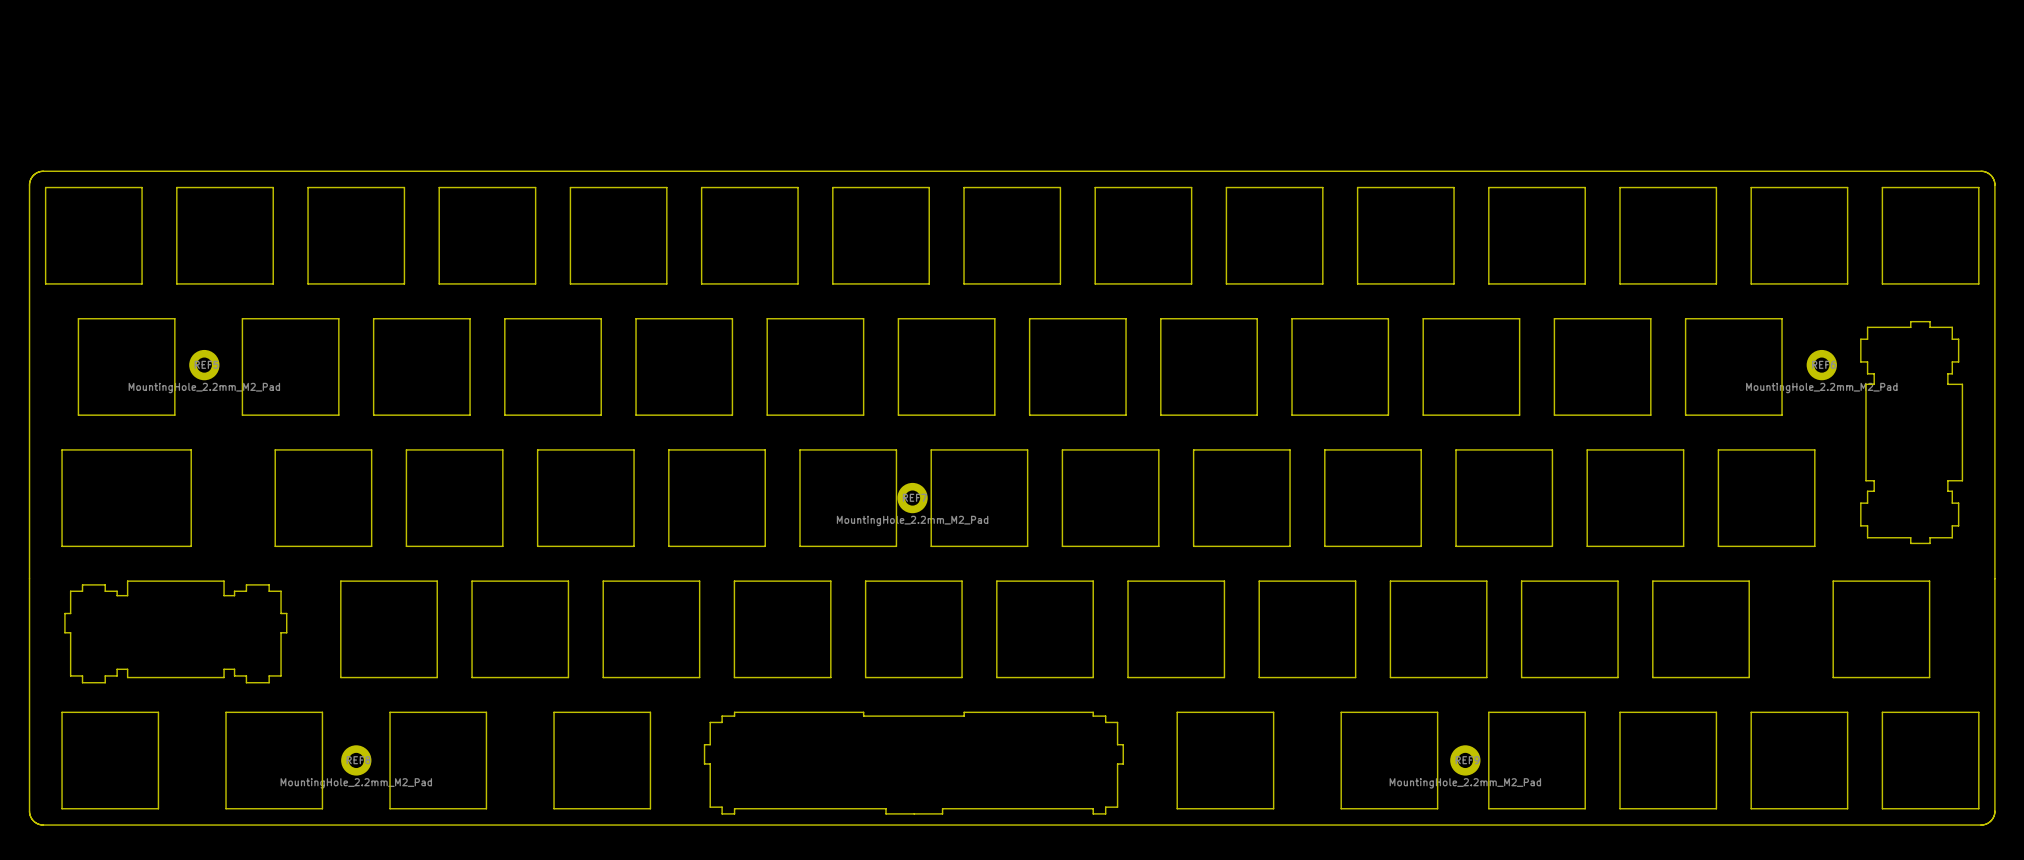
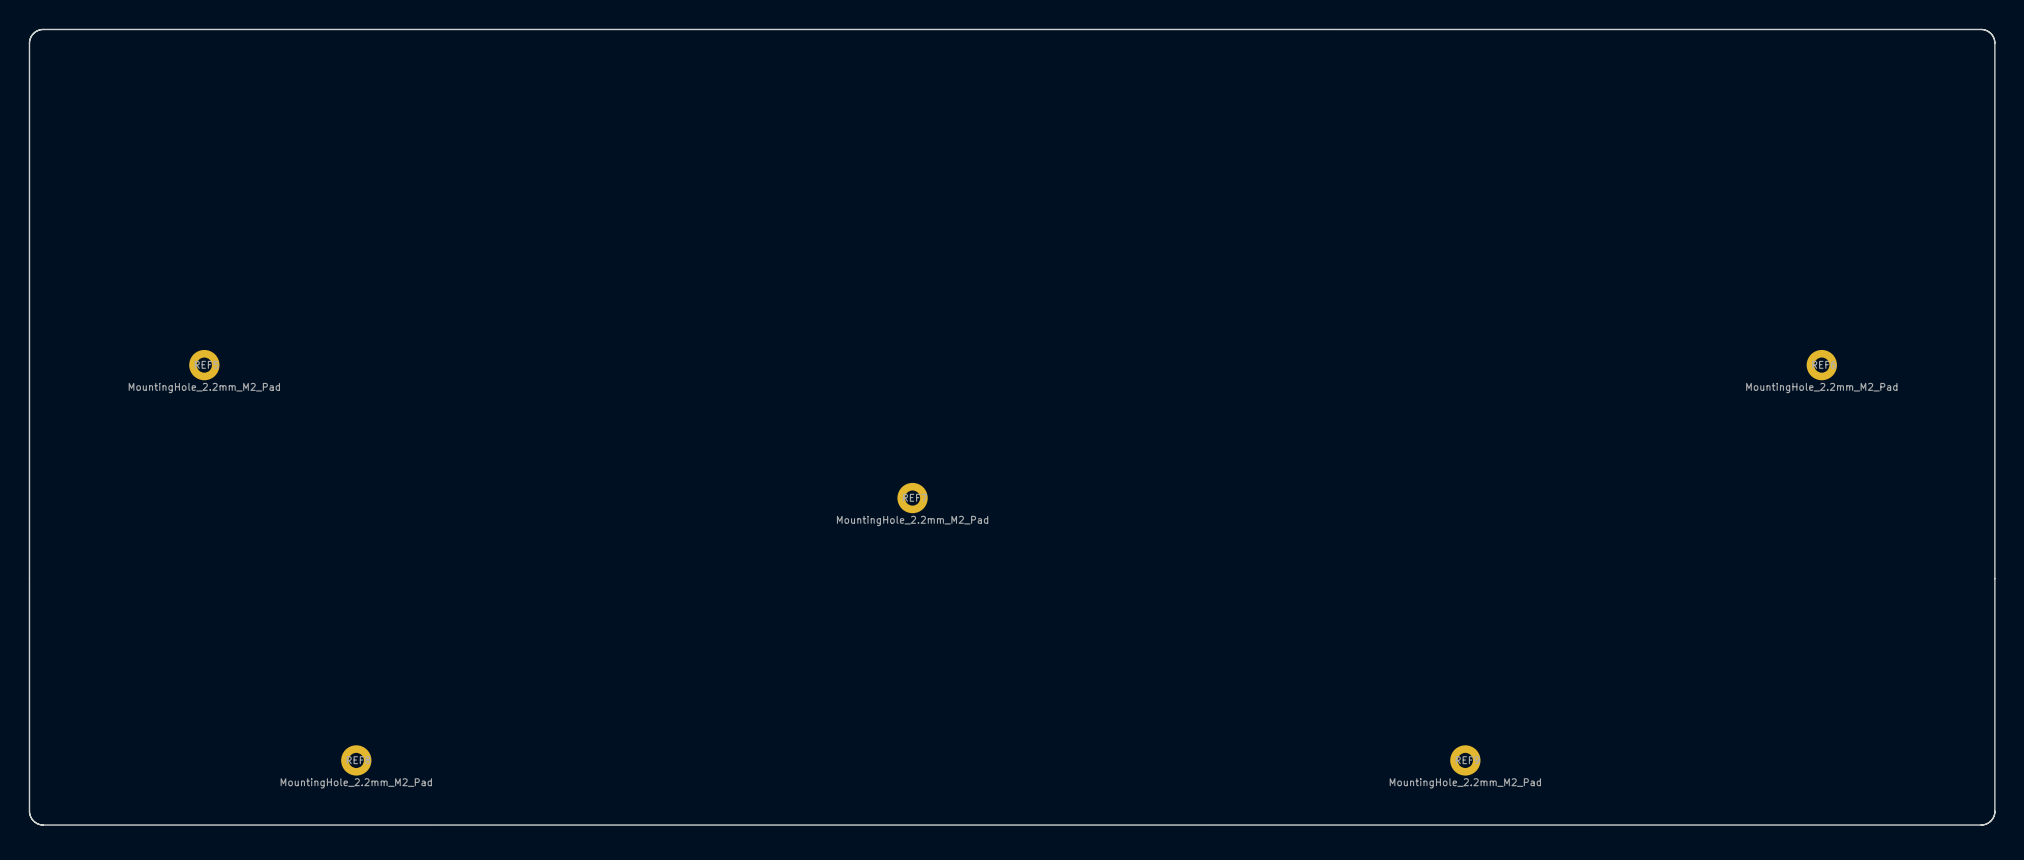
board edge: (1994, 185) (1990, 175) (1981, 171) (39, 171) (32, 176) (29, 185) (29, 812) -> (1994, 185) (1994, 42) (1990, 33) (1982, 29) (38, 30) (32, 35) (29, 43) (29, 812)
board edge: (45, 187) (142, 187) (142, 283) (45, 283) (45, 187) -> none
board edge: (176, 187) (273, 187) (273, 283) (176, 283) (176, 187) -> none
board edge: (308, 187) (404, 187) (404, 283) (308, 283) (308, 187) -> none
board edge: (439, 187) (535, 187) (535, 283) (439, 283) (439, 187) -> none
board edge: (570, 187) (666, 187) (666, 283) (570, 283) (570, 187) -> none
board edge: (701, 187) (798, 187) (798, 283) (701, 283) (701, 187) -> none
board edge: (832, 187) (929, 187) (929, 283) (832, 283) (832, 187) -> none
board edge: (964, 187) (1060, 187) (1060, 283) (964, 283) (964, 187) -> none
board edge: (1095, 187) (1191, 187) (1191, 283) (1095, 283) (1095, 187) -> none
board edge: (1226, 187) (1322, 187) (1322, 283) (1226, 283) (1226, 187) -> none
board edge: (1357, 187) (1454, 187) (1454, 283) (1357, 283) (1357, 187) -> none
board edge: (1488, 187) (1585, 187) (1585, 283) (1488, 283) (1488, 187) -> none
board edge: (1620, 187) (1716, 187) (1716, 283) (1620, 283) (1620, 187) -> none
board edge: (1751, 187) (1847, 187) (1847, 283) (1751, 283) (1751, 187) -> none
board edge: (1882, 187) (1882, 283) (1978, 283) (1978, 187) (1882, 187) -> none
board edge: (78, 318) (174, 318) (174, 415) (78, 415) (78, 318) -> none
board edge: (242, 318) (338, 318) (338, 415) (242, 415) (242, 318) -> none
board edge: (373, 318) (470, 318) (470, 415) (373, 415) (373, 318) -> none
board edge: (504, 318) (601, 318) (601, 415) (504, 415) (504, 318) -> none
board edge: (636, 318) (732, 318) (732, 415) (636, 415) (636, 318) -> none
board edge: (767, 318) (863, 318) (863, 415) (767, 415) (767, 318) -> none
board edge: (898, 318) (994, 318) (994, 415) (898, 415) (898, 318) -> none
board edge: (1029, 318) (1126, 318) (1126, 415) (1029, 415) (1029, 318) -> none
board edge: (1160, 318) (1257, 318) (1257, 415) (1160, 415) (1160, 318) -> none
board edge: (1292, 318) (1388, 318) (1388, 415) (1292, 415) (1292, 318) -> none
board edge: (1423, 318) (1519, 318) (1519, 415) (1423, 415) (1423, 318) -> none
board edge: (1554, 318) (1650, 318) (1650, 415) (1554, 415) (1554, 318) -> none
board edge: (1685, 318) (1685, 415) (1782, 415) (1782, 318) (1685, 318) -> none
board edge: (1910, 321) (1930, 321) (1930, 327) (1952, 327) (1952, 339) (1958, 339) (1958, 361) (1952, 361) (1952, 373) (1947, 373) (1947, 384) (1962, 384) (1962, 480) (1947, 480) (1947, 491) (1952, 491) (1952, 503) (1958, 503) (1958, 525) (1952, 525) (1952, 537) (1930, 537) (1930, 543) (1910, 543) (1910, 537) (1867, 537) (1867, 525) (1860, 525) (1860, 503) (1867, 503) (1867, 491) (1874, 491) (1874, 480) (1865, 480) (1865, 384) (1874, 384) (1874, 373) (1867, 373) (1867, 361) (1860, 361) (1860, 339) (1867, 339) (1867, 327) (1910, 327) (1910, 321) -> none
board edge: (62, 449) (191, 449) (191, 546) (62, 546) (62, 449) -> none
board edge: (275, 449) (371, 449) (371, 546) (275, 546) (275, 449) -> none
board edge: (406, 449) (502, 449) (502, 546) (406, 546) (406, 449) -> none
board edge: (537, 449) (634, 449) (634, 546) (537, 546) (537, 449) -> none
board edge: (668, 449) (765, 449) (765, 546) (668, 546) (668, 449) -> none
board edge: (800, 449) (896, 449) (896, 546) (800, 546) (800, 449) -> none
board edge: (931, 449) (1027, 449) (1027, 546) (931, 546) (931, 449) -> none
board edge: (1062, 449) (1158, 449) (1158, 546) (1062, 546) (1062, 449) -> none
board edge: (1193, 449) (1290, 449) (1290, 546) (1193, 546) (1193, 449) -> none
board edge: (1324, 449) (1421, 449) (1421, 546) (1324, 546) (1324, 449) -> none
board edge: (1456, 449) (1552, 449) (1552, 546) (1456, 546) (1456, 449) -> none
board edge: (1587, 449) (1683, 449) (1683, 546) (1587, 546) (1587, 449) -> none
board edge: (1718, 449) (1718, 546) (1814, 546) (1814, 449) (1718, 449) -> none
board edge: (127, 581) (224, 581) (224, 595) (234, 595) (234, 591) (246, 591) (246, 584) (269, 584) (269, 591) (281, 591) (281, 613) (286, 613) (286, 632) (281, 632) (281, 675) (269, 675) (269, 682) (246, 682) (246, 675) (234, 675) (234, 669) (224, 669) (224, 677) (127, 677) (127, 669) (117, 669) (117, 675) (105, 675) (105, 682) (82, 682) (82, 675) (70, 675) (70, 632) (64, 632) (64, 613) (70, 613) (70, 591) (82, 591) (82, 584) (105, 584) (105, 591) (117, 591) (117, 595) (127, 595) (127, 581) -> none
board edge: (340, 581) (437, 581) (437, 677) (340, 677) (340, 581) -> none
board edge: (472, 581) (568, 581) (568, 677) (472, 677) (472, 581) -> none
board edge: (603, 581) (699, 581) (699, 677) (603, 677) (603, 581) -> none
board edge: (734, 581) (830, 581) (830, 677) (734, 677) (734, 581) -> none
board edge: (865, 581) (962, 581) (962, 677) (865, 677) (865, 581) -> none
board edge: (996, 581) (1093, 581) (1093, 677) (996, 677) (996, 581) -> none
board edge: (1128, 581) (1224, 581) (1224, 677) (1128, 677) (1128, 581) -> none
board edge: (1259, 581) (1355, 581) (1355, 677) (1259, 677) (1259, 581) -> none
board edge: (1390, 581) (1486, 581) (1486, 677) (1390, 677) (1390, 581) -> none
board edge: (1521, 581) (1618, 581) (1618, 677) (1521, 677) (1521, 581) -> none
board edge: (1652, 581) (1749, 581) (1749, 677) (1652, 677) (1652, 581) -> none
board edge: (1833, 581) (1833, 677) (1929, 677) (1929, 581) (1833, 581) -> none
board edge: (62, 712) (62, 808) (158, 808) (158, 712) (62, 712) -> none
board edge: (226, 712) (322, 712) (322, 808) (226, 808) (226, 712) -> none
board edge: (390, 712) (486, 712) (486, 808) (390, 808) (390, 712) -> none
board edge: (554, 712) (650, 712) (650, 808) (554, 808) (554, 712) -> none
board edge: (734, 712) (734, 716) (722, 716) (722, 722) (710, 722) (710, 744) (704, 744) (704, 763) (710, 763) (710, 807) (722, 807) (722, 813) (734, 813) (734, 808) (886, 808) (886, 813) (942, 813) (942, 808) (1093, 808) (1093, 813) (1105, 813) (1105, 807) (1117, 807) (1117, 763) (1123, 763) (1123, 744) (1117, 744) (1117, 722) (1105, 722) (1105, 716) (1093, 716) (1093, 712) (964, 712) (964, 716) (863, 716) (863, 712) (734, 712) -> none
board edge: (1177, 712) (1273, 712) (1273, 808) (1177, 808) (1177, 712) -> none
board edge: (1341, 712) (1437, 712) (1437, 808) (1341, 808) (1341, 712) -> none
board edge: (1488, 712) (1488, 808) (1585, 808) (1585, 712) (1488, 712) -> none
board edge: (1620, 712) (1620, 808) (1716, 808) (1716, 712) (1620, 712) -> none
board edge: (1751, 712) (1751, 808) (1847, 808) (1847, 712) (1751, 712) -> none
board edge: (1882, 712) (1882, 808) (1978, 808) (1978, 712) (1882, 712) -> none

